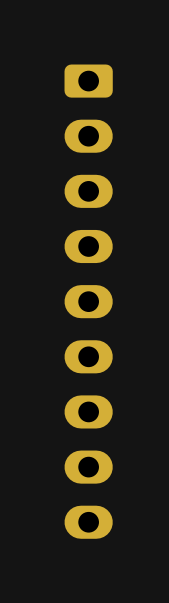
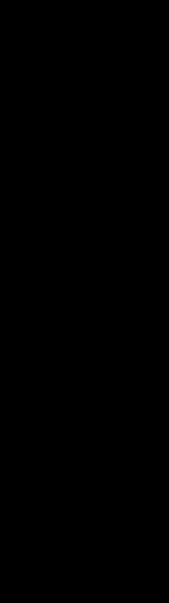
part: (88, 301) -> none

